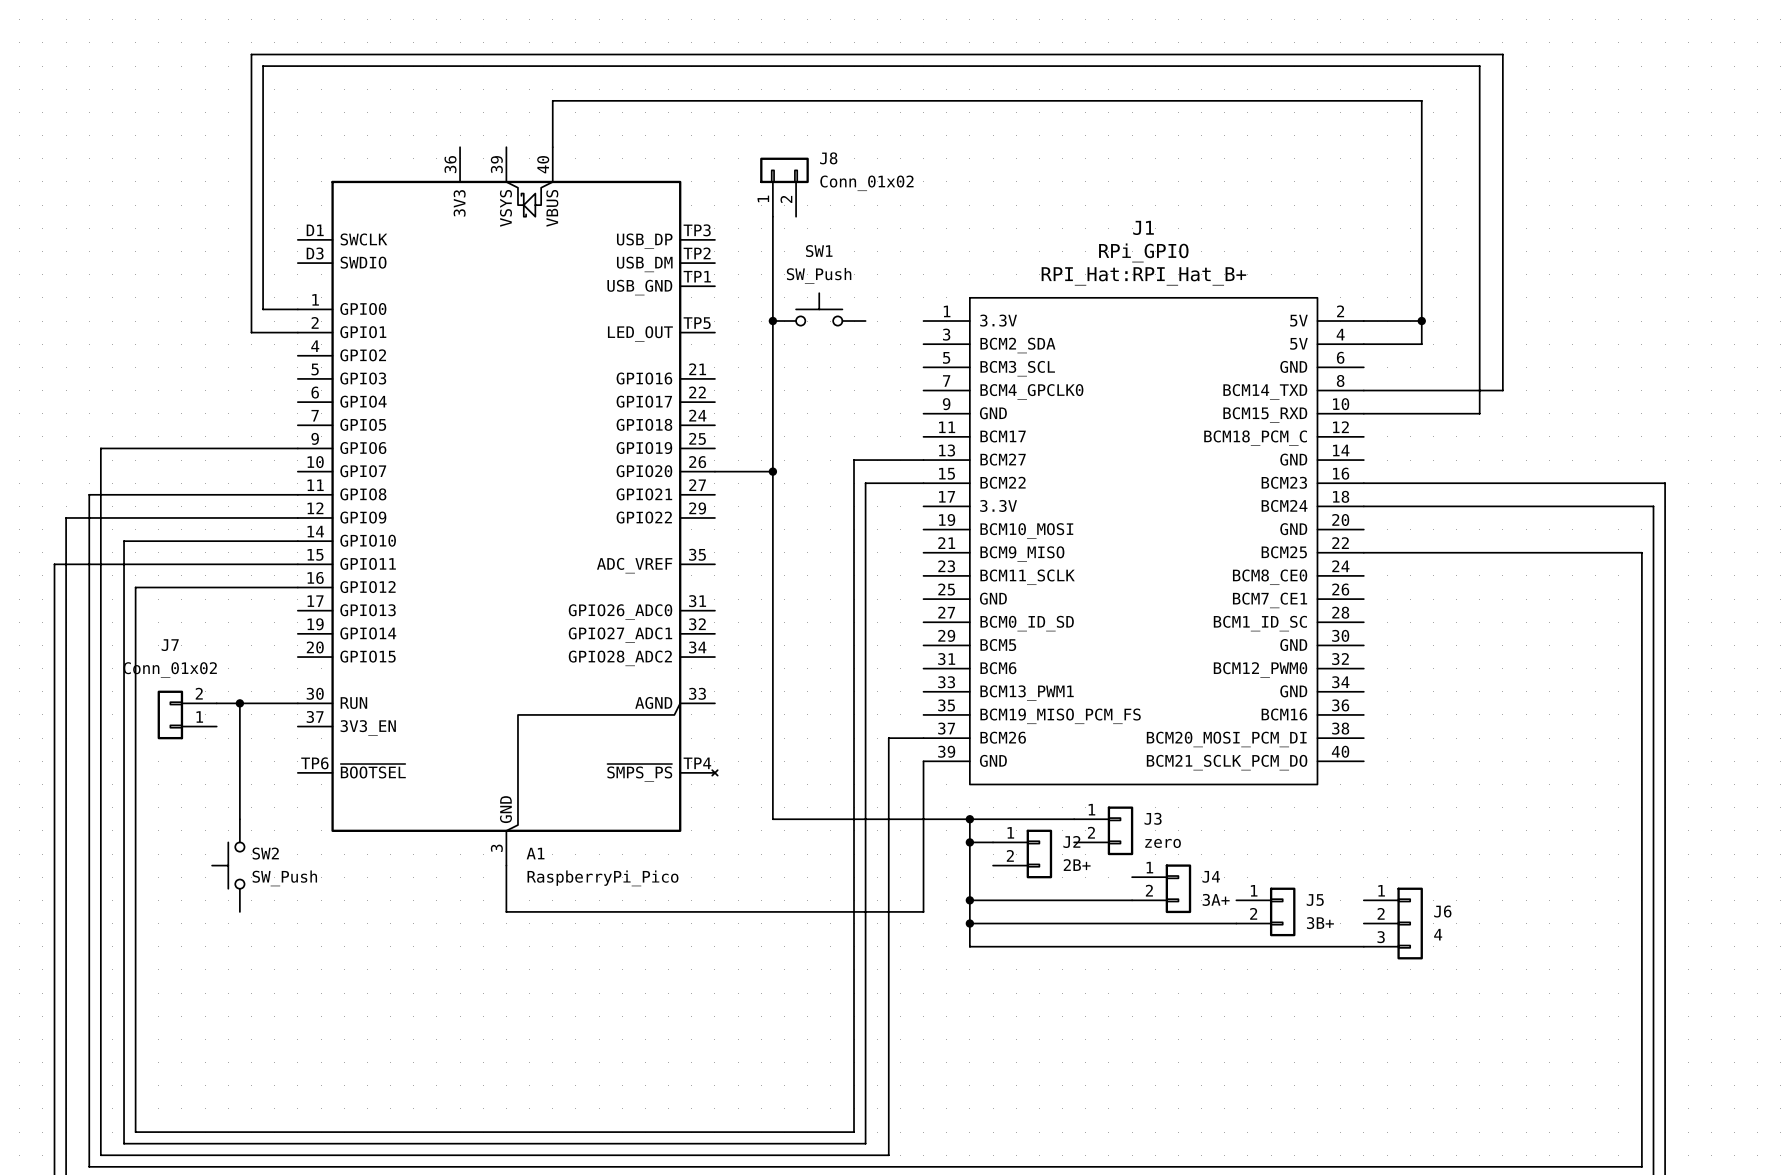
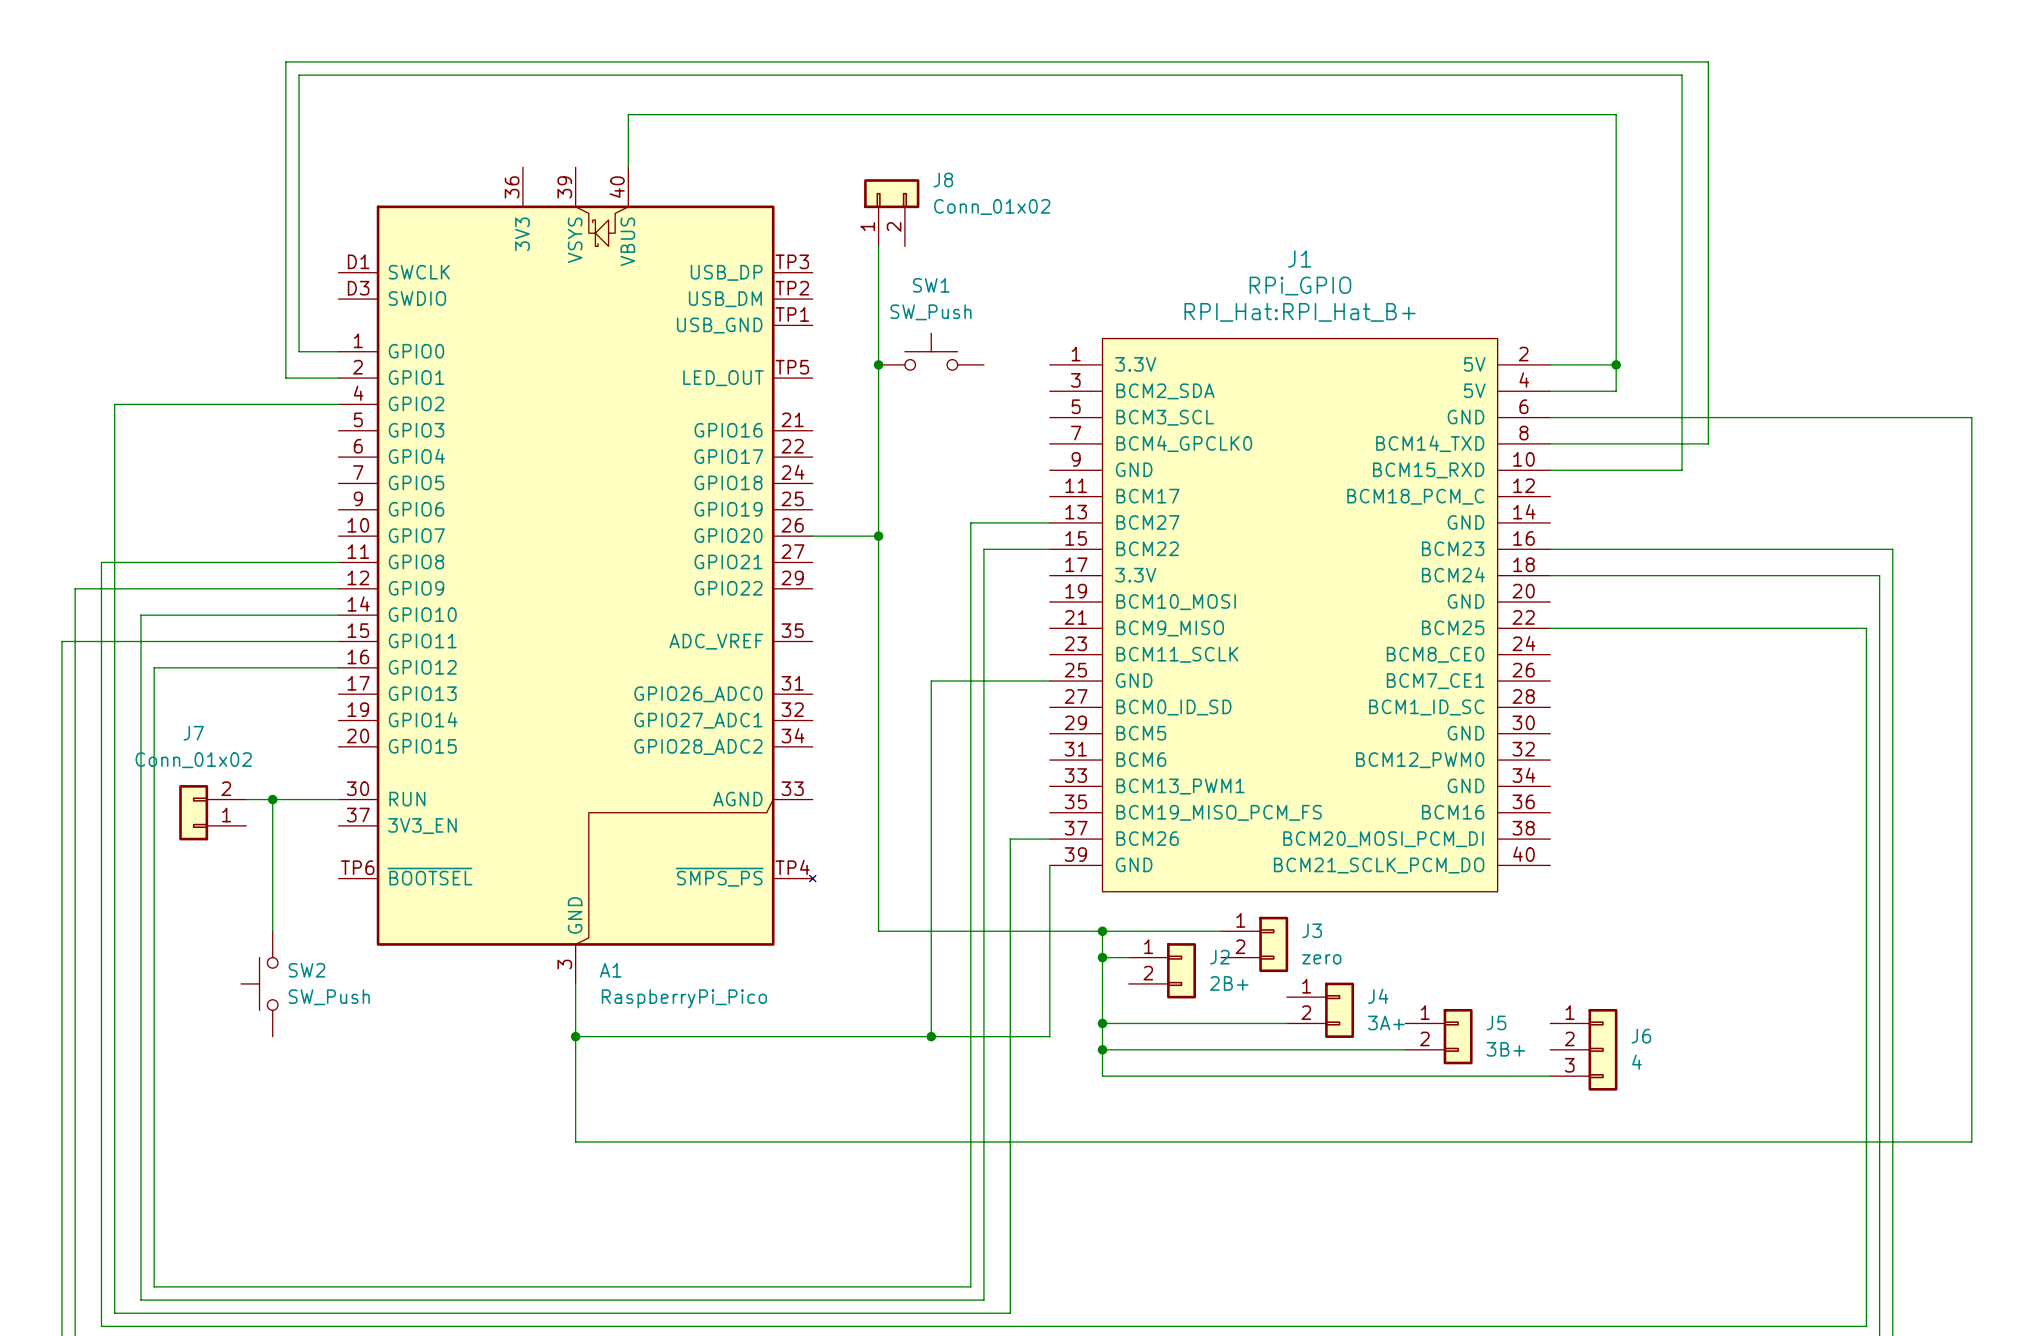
wire: none -> (1550, 417) (1971, 417) (1971, 1142) (575, 1142) (575, 1036)
wire: (100, 448) (297, 448) -> (114, 509) (114, 404) (338, 404)
wire: none -> (1049, 681) (931, 681) (931, 1036)
junction: none -> (575, 1036)
junction: none -> (931, 1036)

